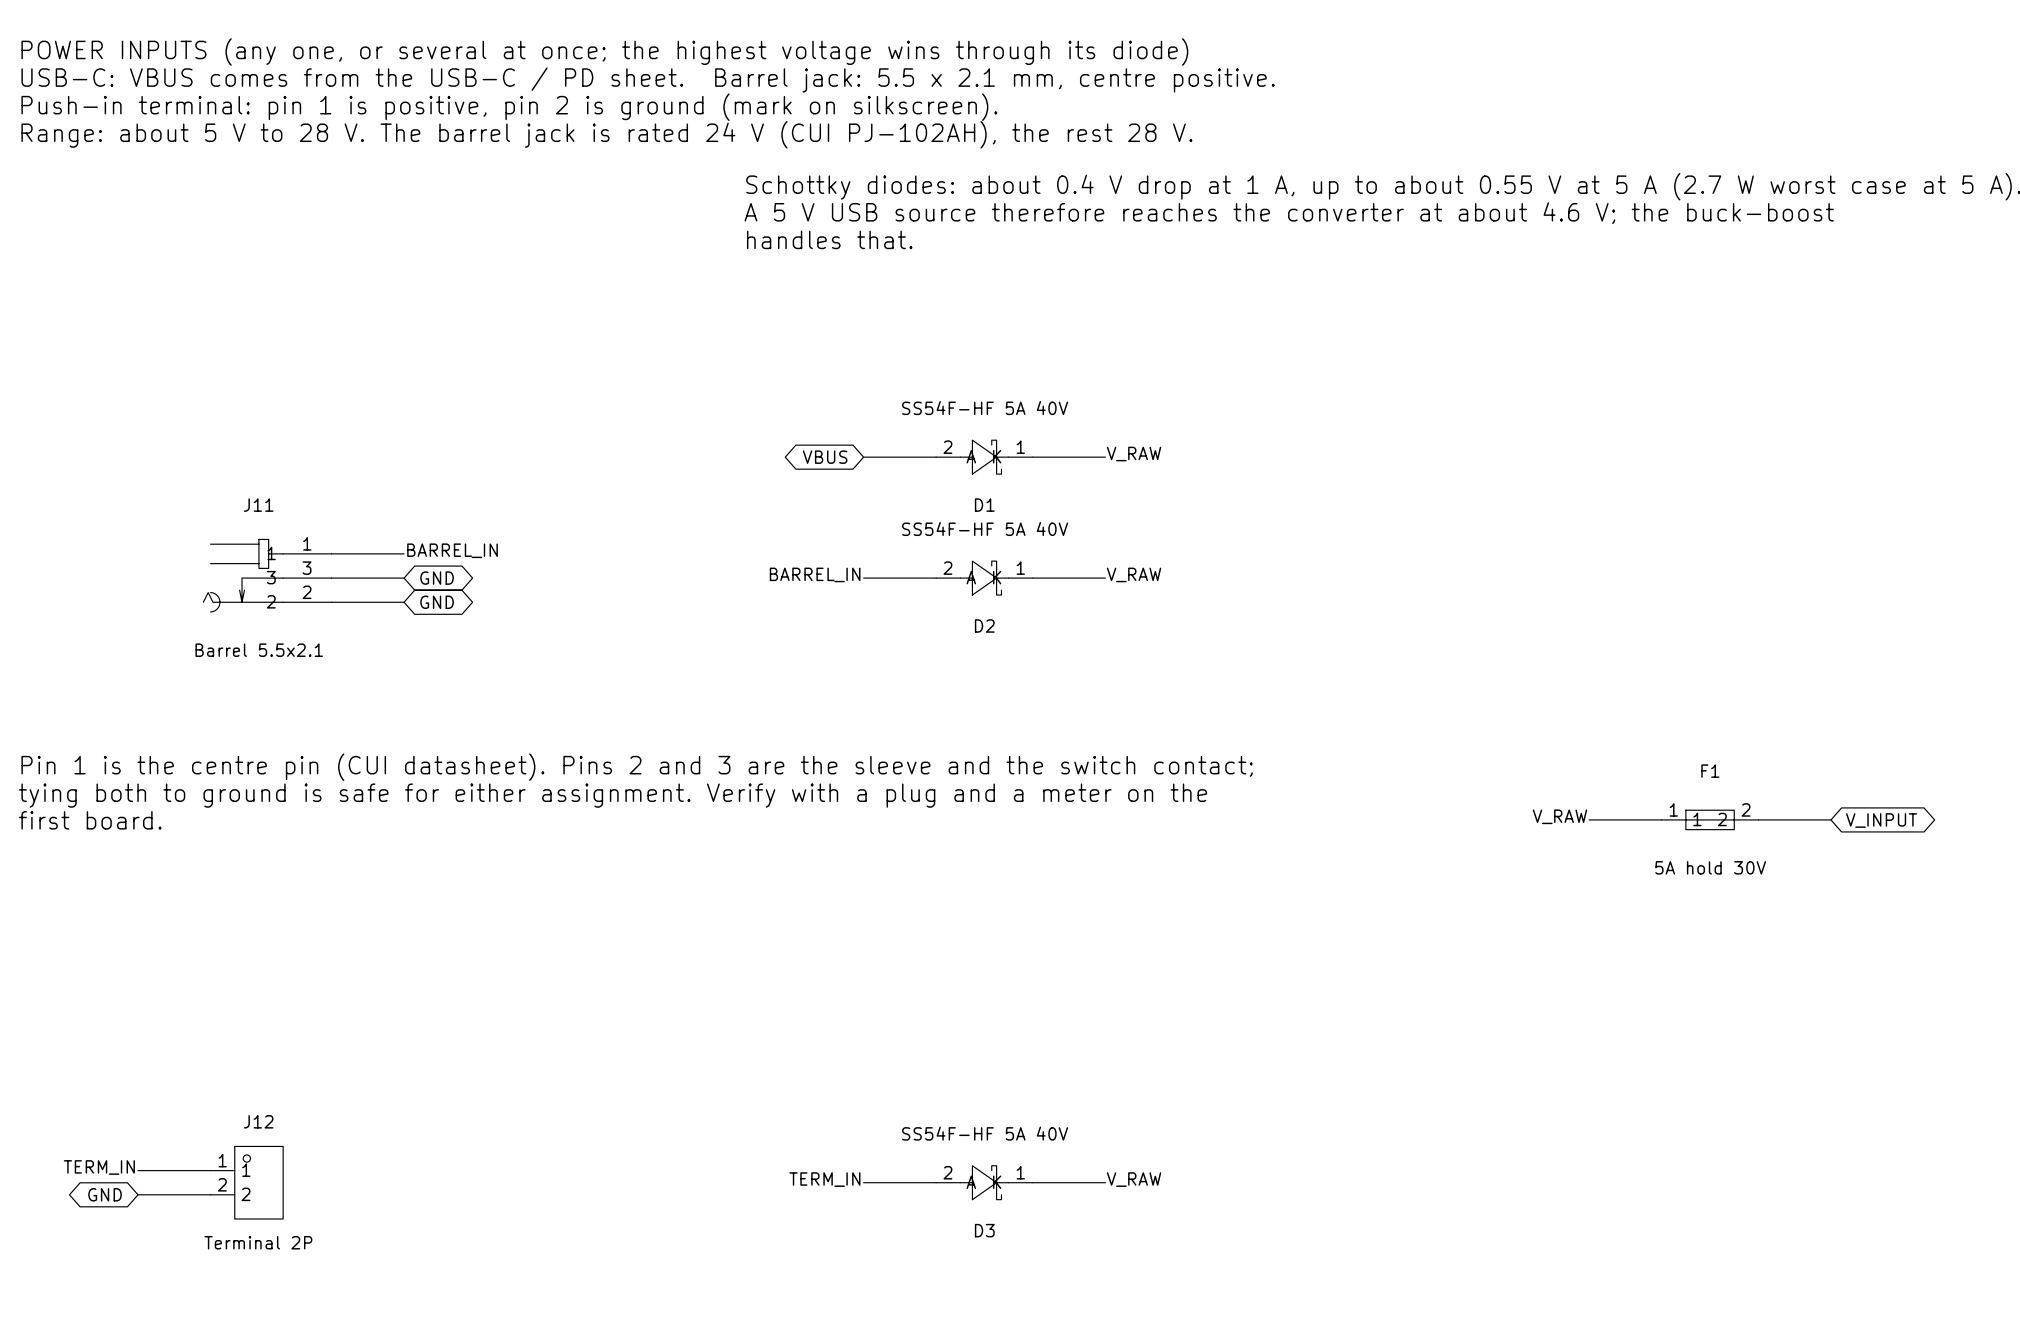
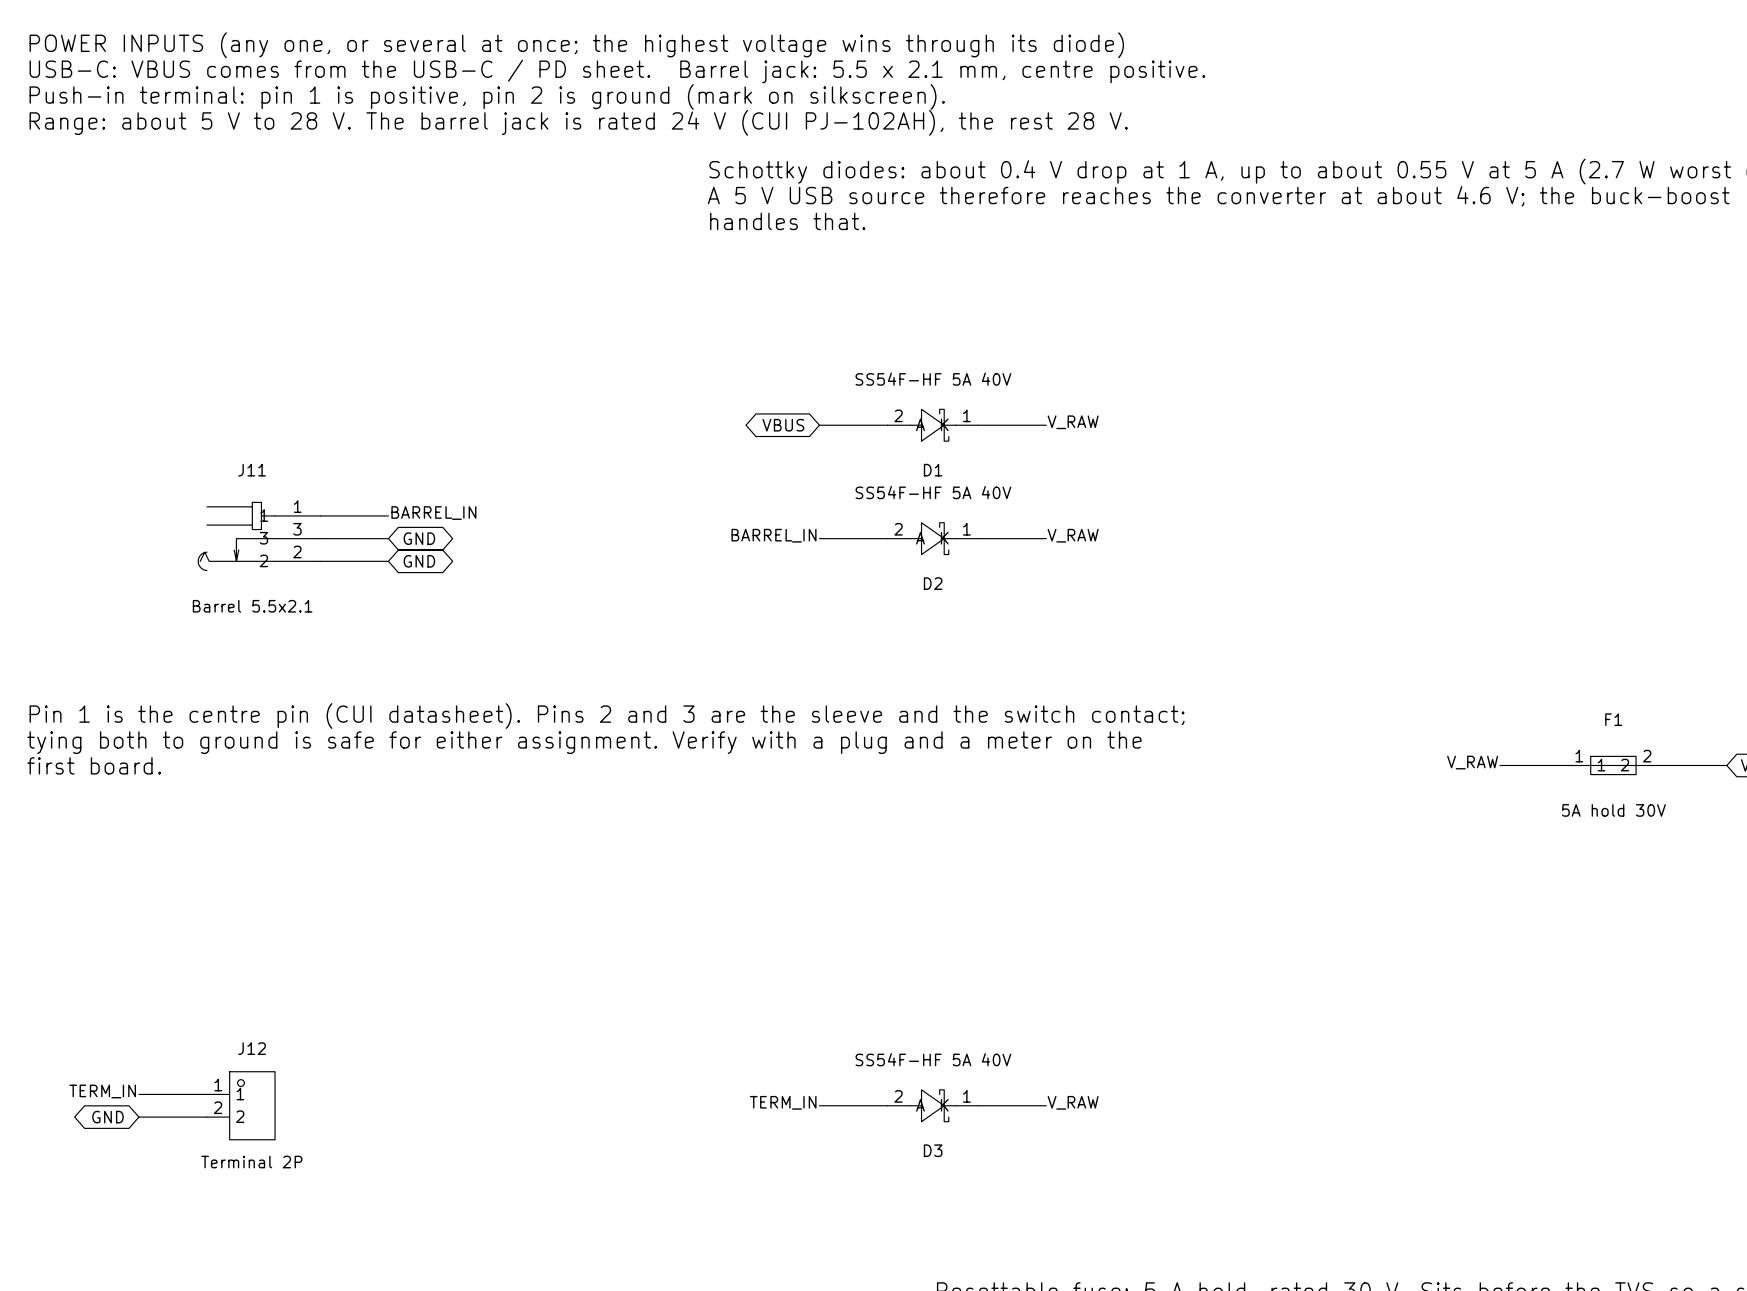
J11 symbol: [203, 539, 332, 612] -> [198, 502, 321, 571]

